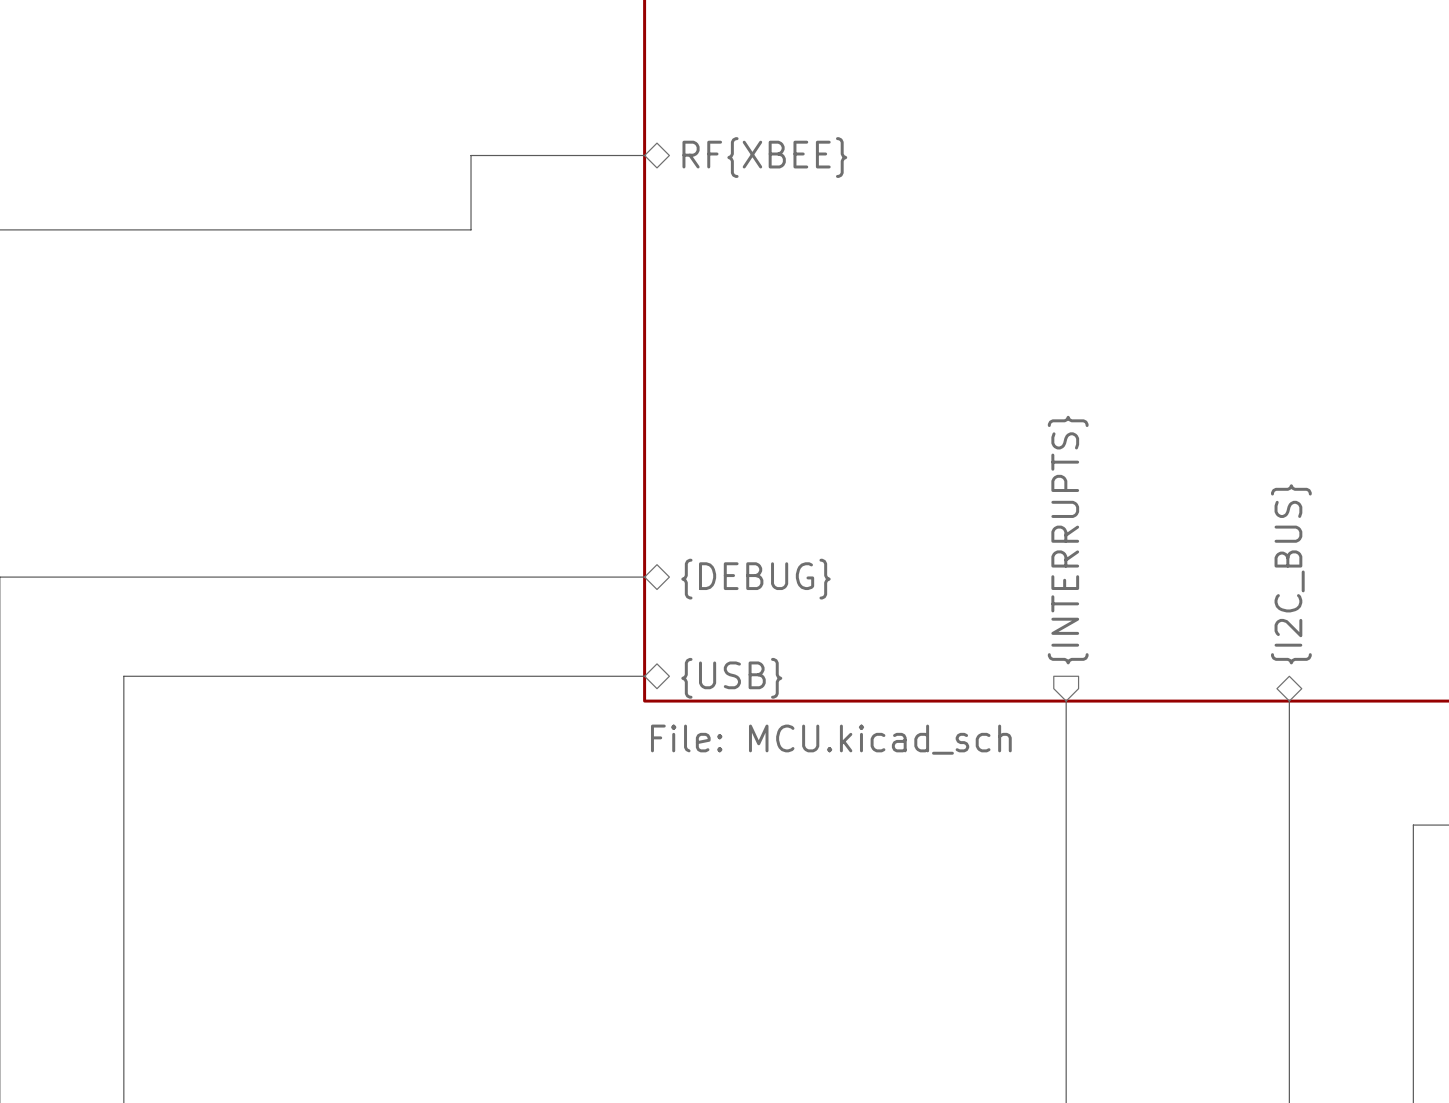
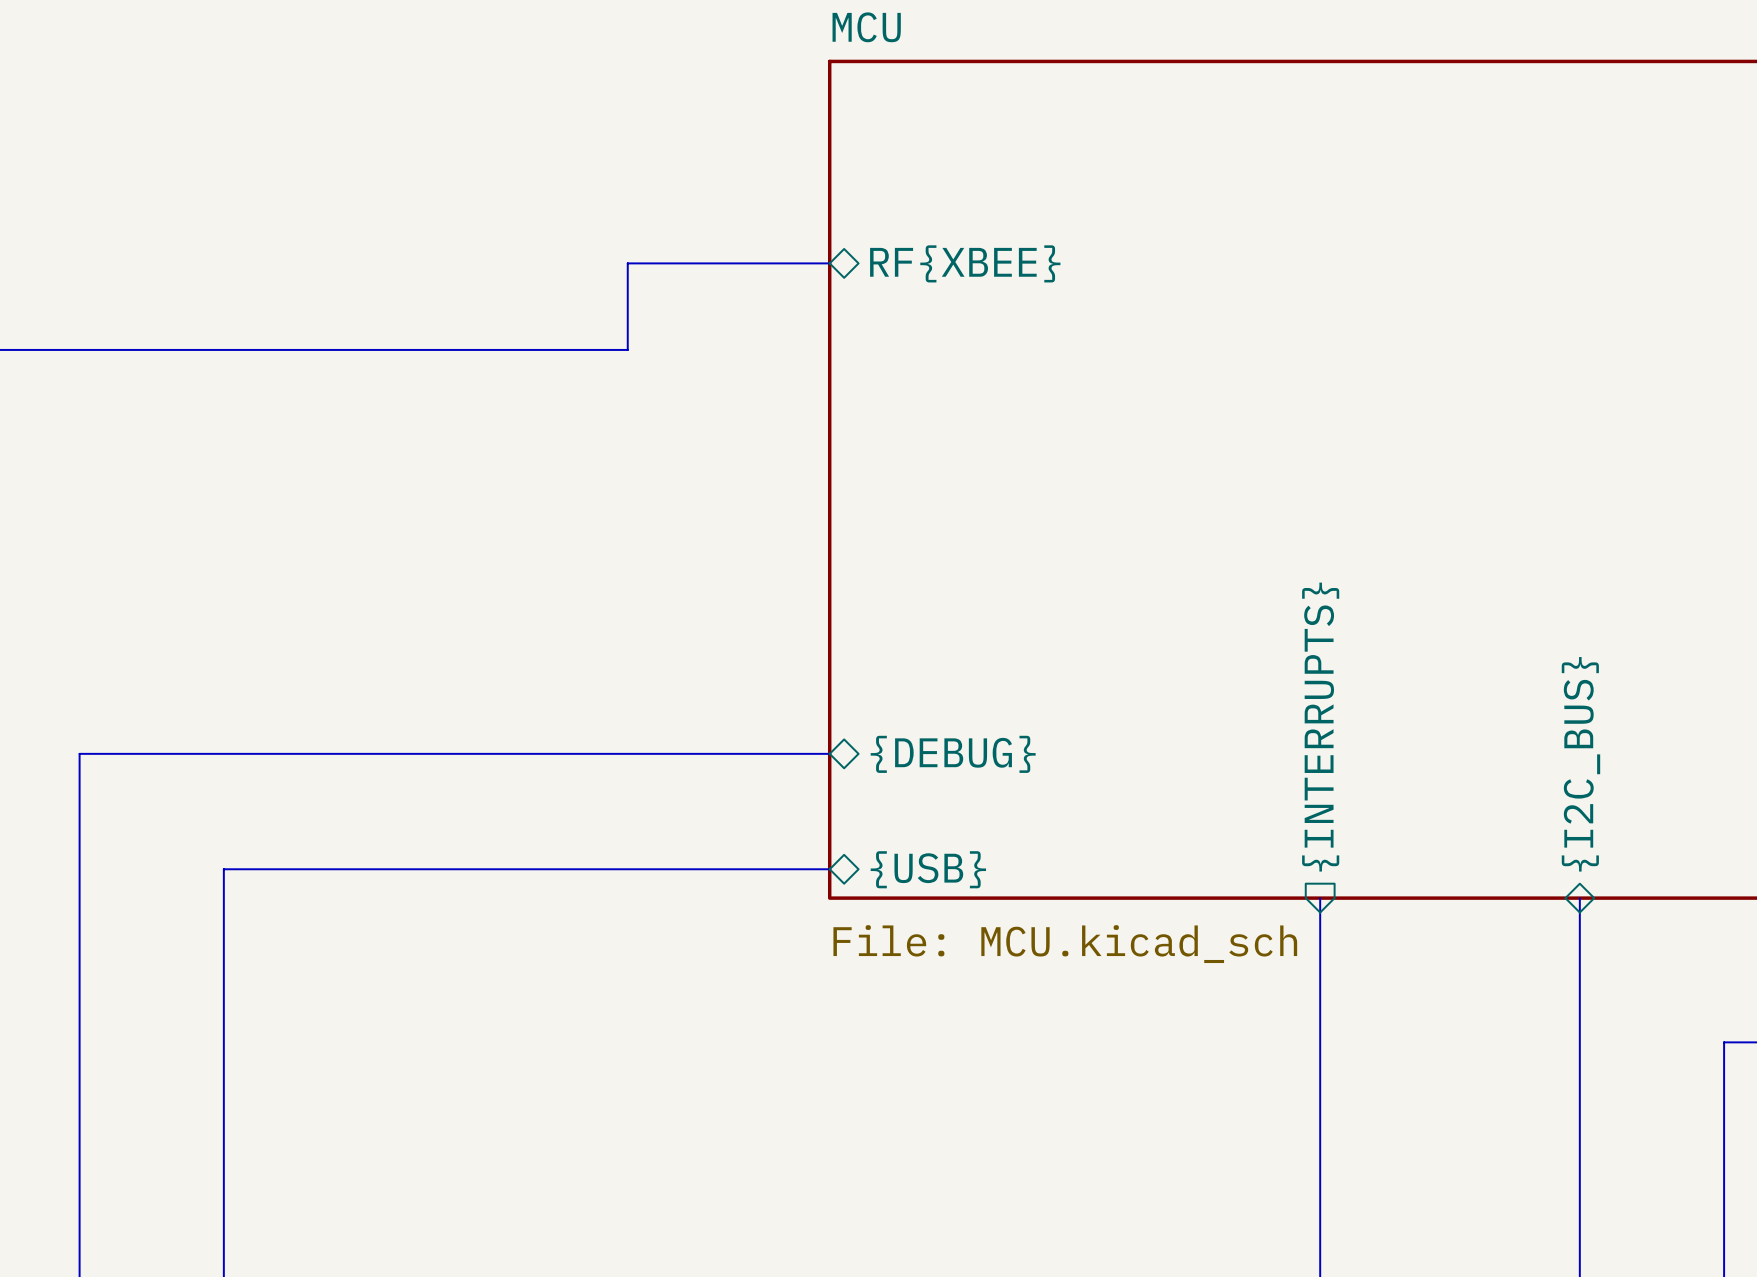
sheet pin position: {INTERRUPTS} (1068, 540) -> {INTERRUPTS} (1320, 727)
sheet pin position: {I2C_BUS} (1291, 574) -> {I2C_BUS} (1580, 764)

